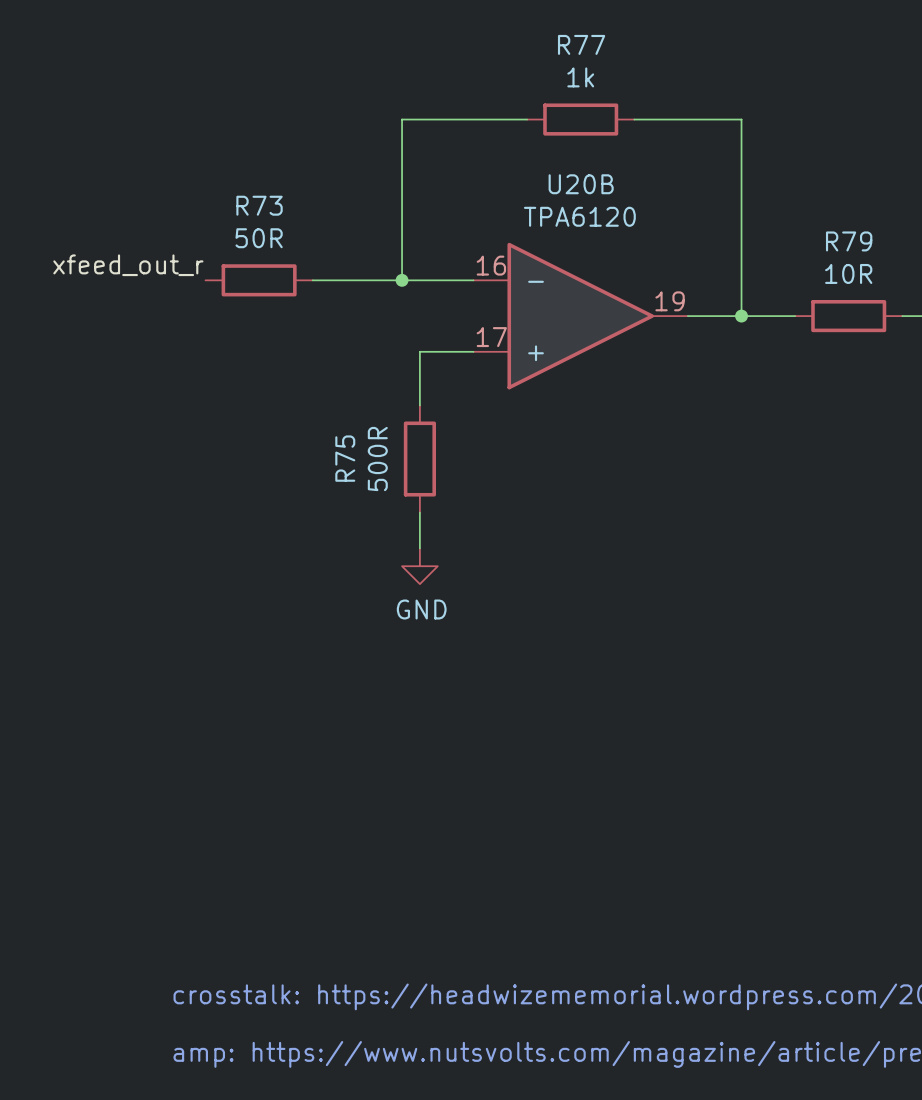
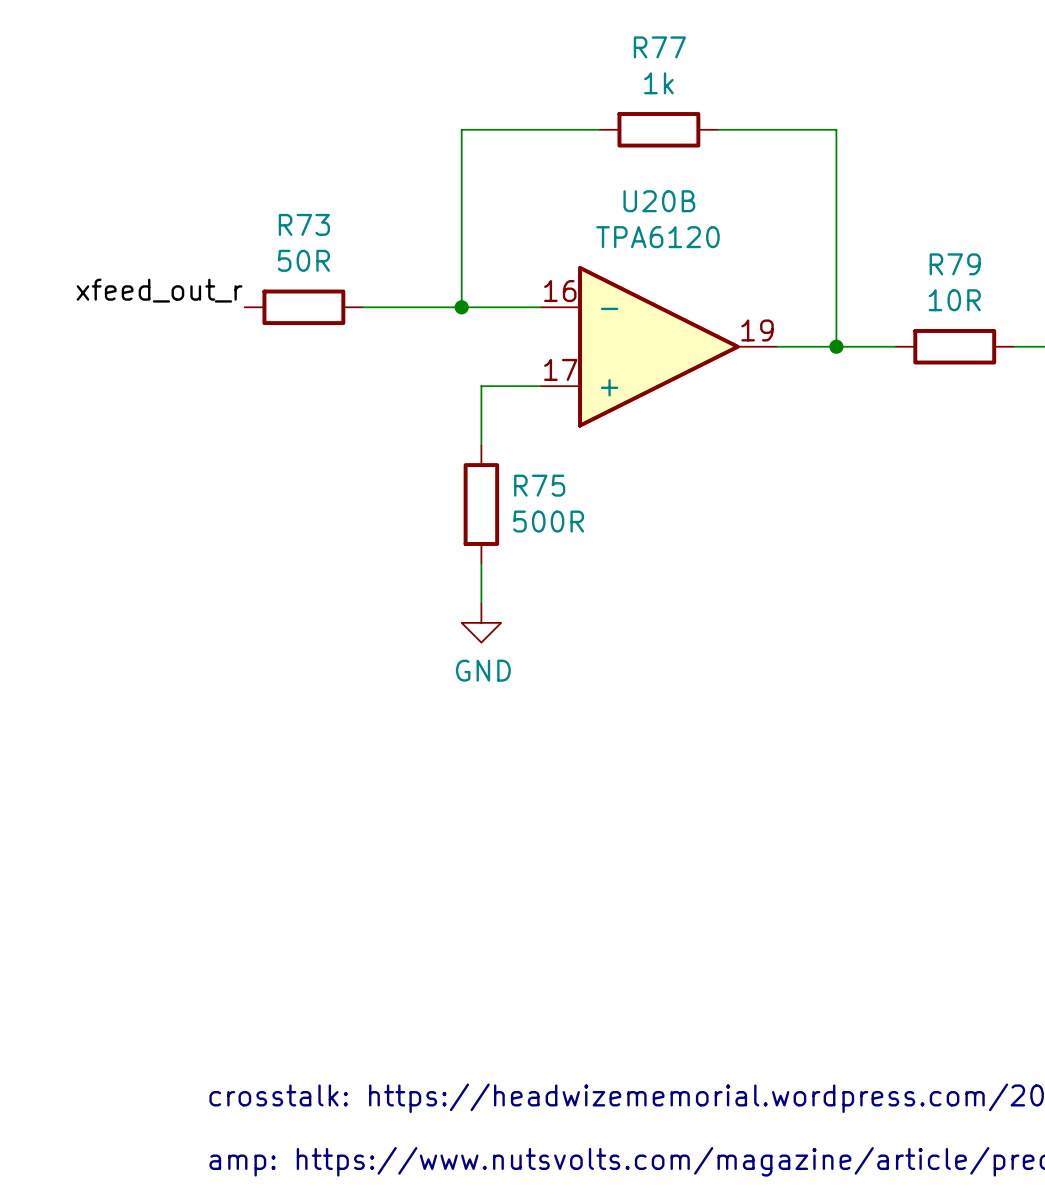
R75 name rotation: 0° (345, 458) -> 90° clockwise (539, 485)
R75 name position: R75 (345, 458) -> R75 (539, 485)
R75 value rotation: 0° (377, 459) -> 90° clockwise (548, 521)
R75 value position: 500R (377, 459) -> 500R (548, 521)

